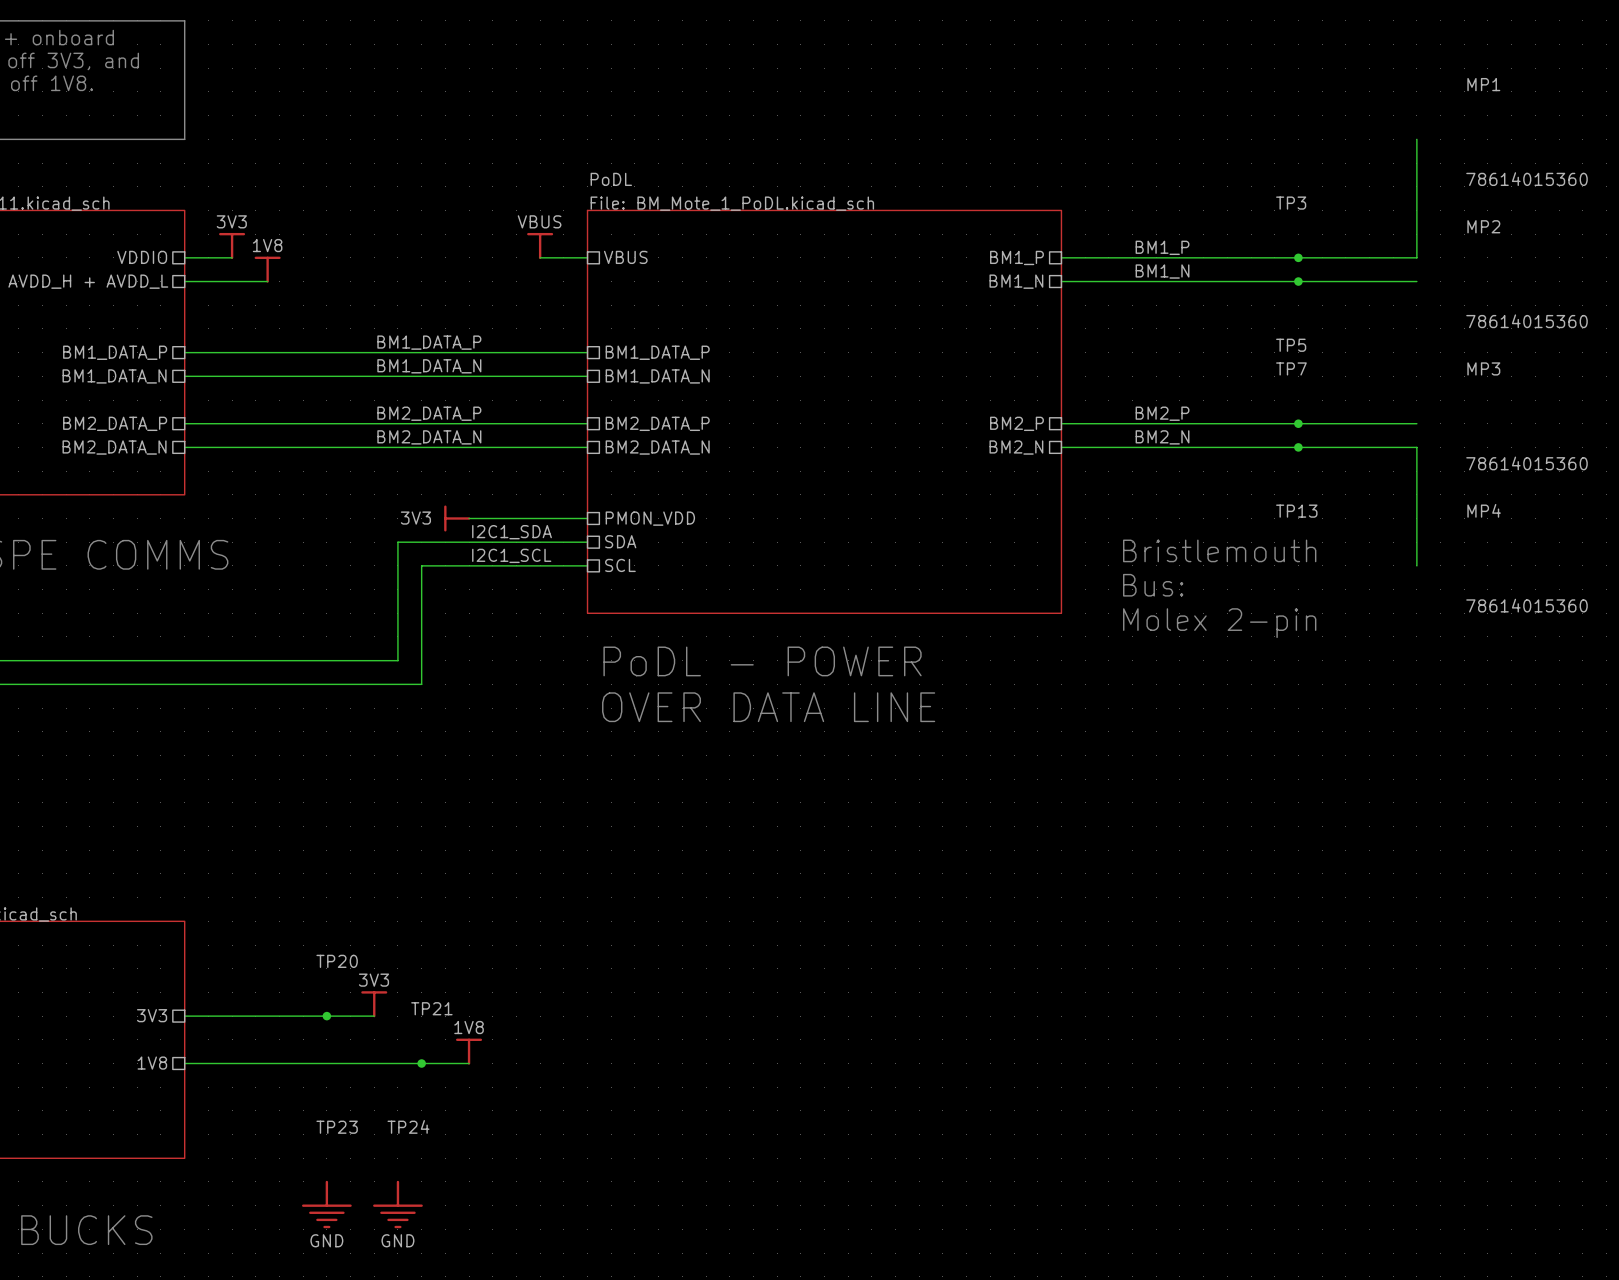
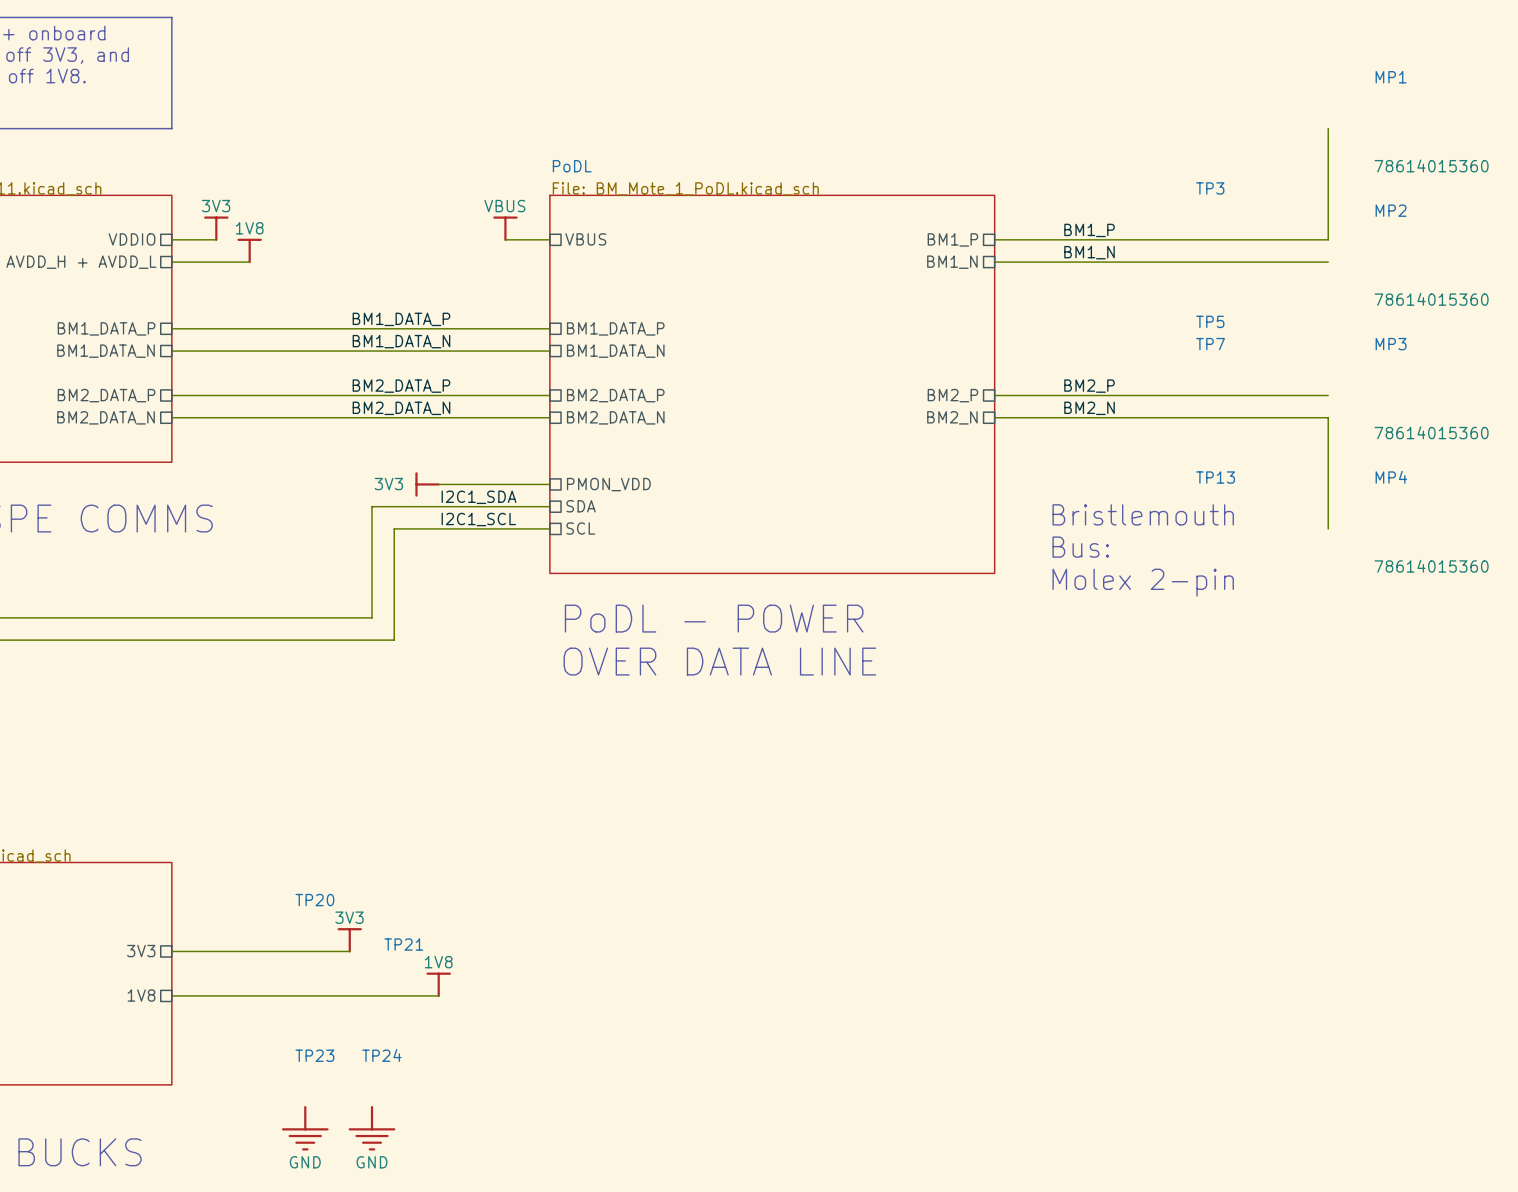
junction: (1298, 257) -> none
junction: (1298, 281) -> none
junction: (1298, 423) -> none
junction: (1298, 447) -> none
junction: (326, 1016) -> none
junction: (421, 1063) -> none

